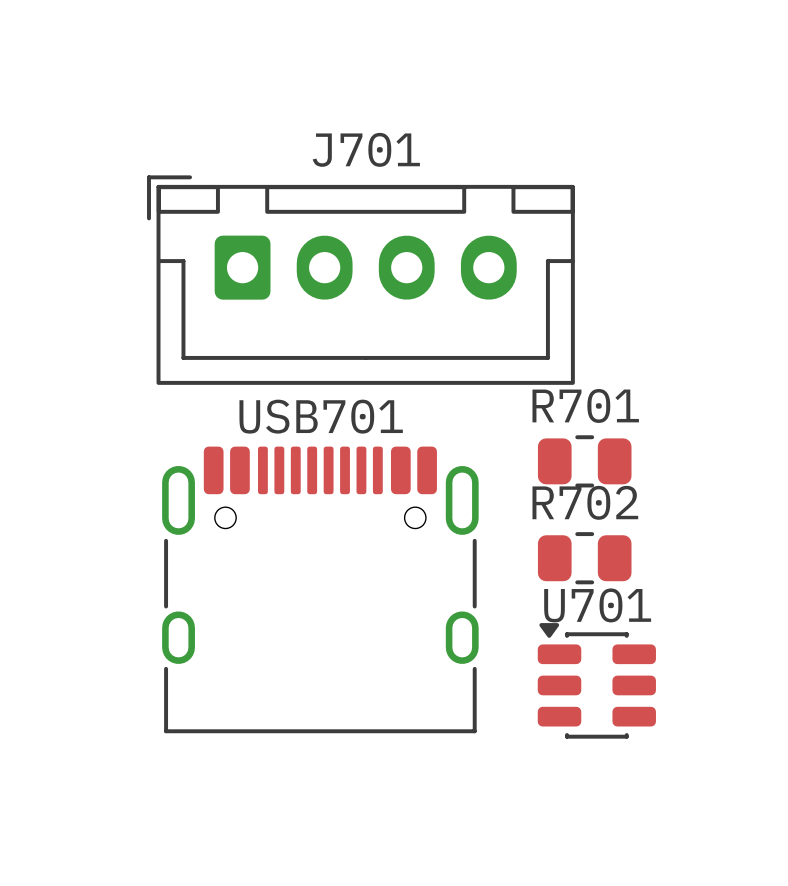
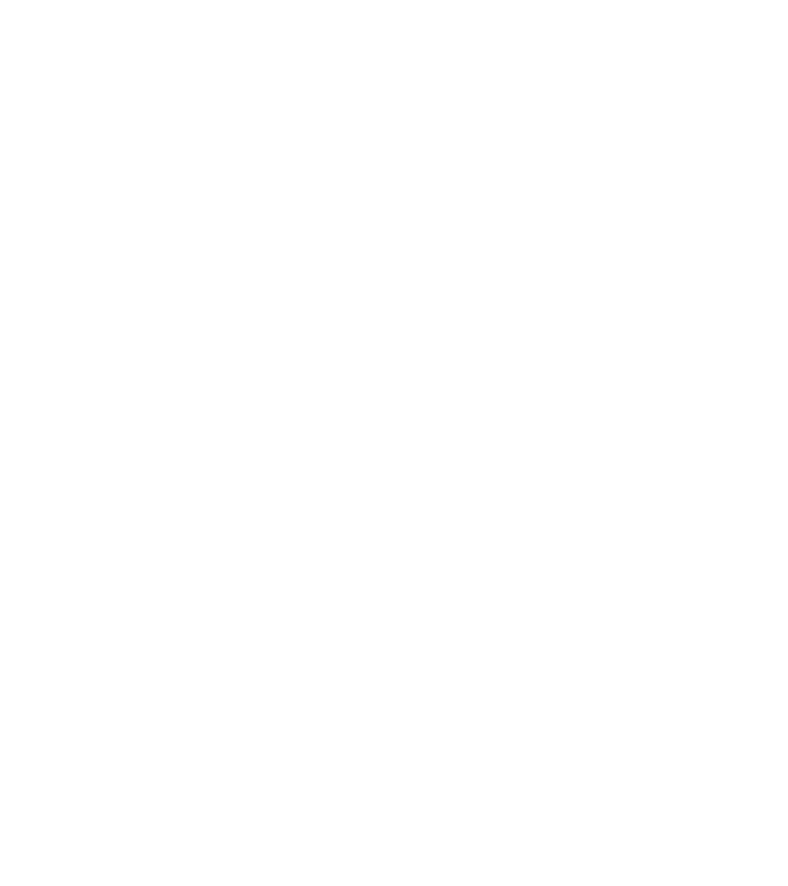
J701: (360, 280) -> none
R701: (584, 461) -> none
R702: (584, 558) -> none
USB701: (320, 589) -> none
U701: (596, 680) -> none

